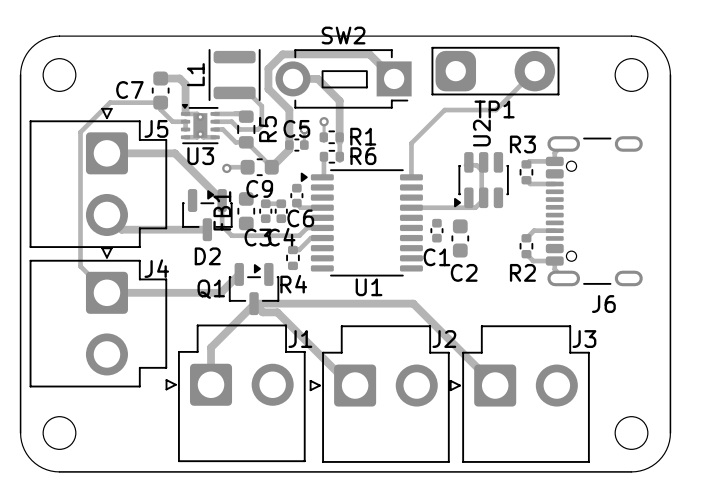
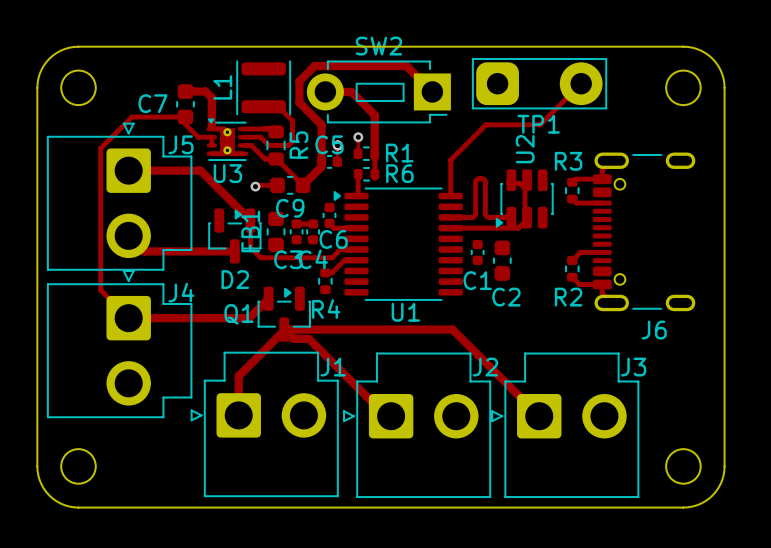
track: none -> (508, 214) (505, 217) (486, 215) (485, 182) (483, 179) (479, 178) (475, 182) (474, 215) (450, 217)

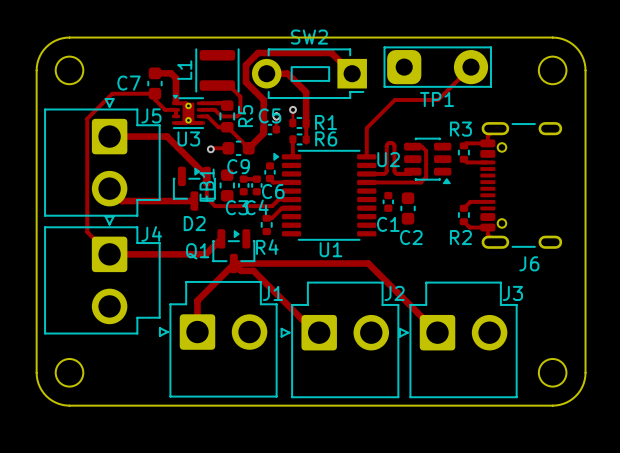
U2 rotation: 0° (524, 198) -> 90° counterclockwise (427, 160)

